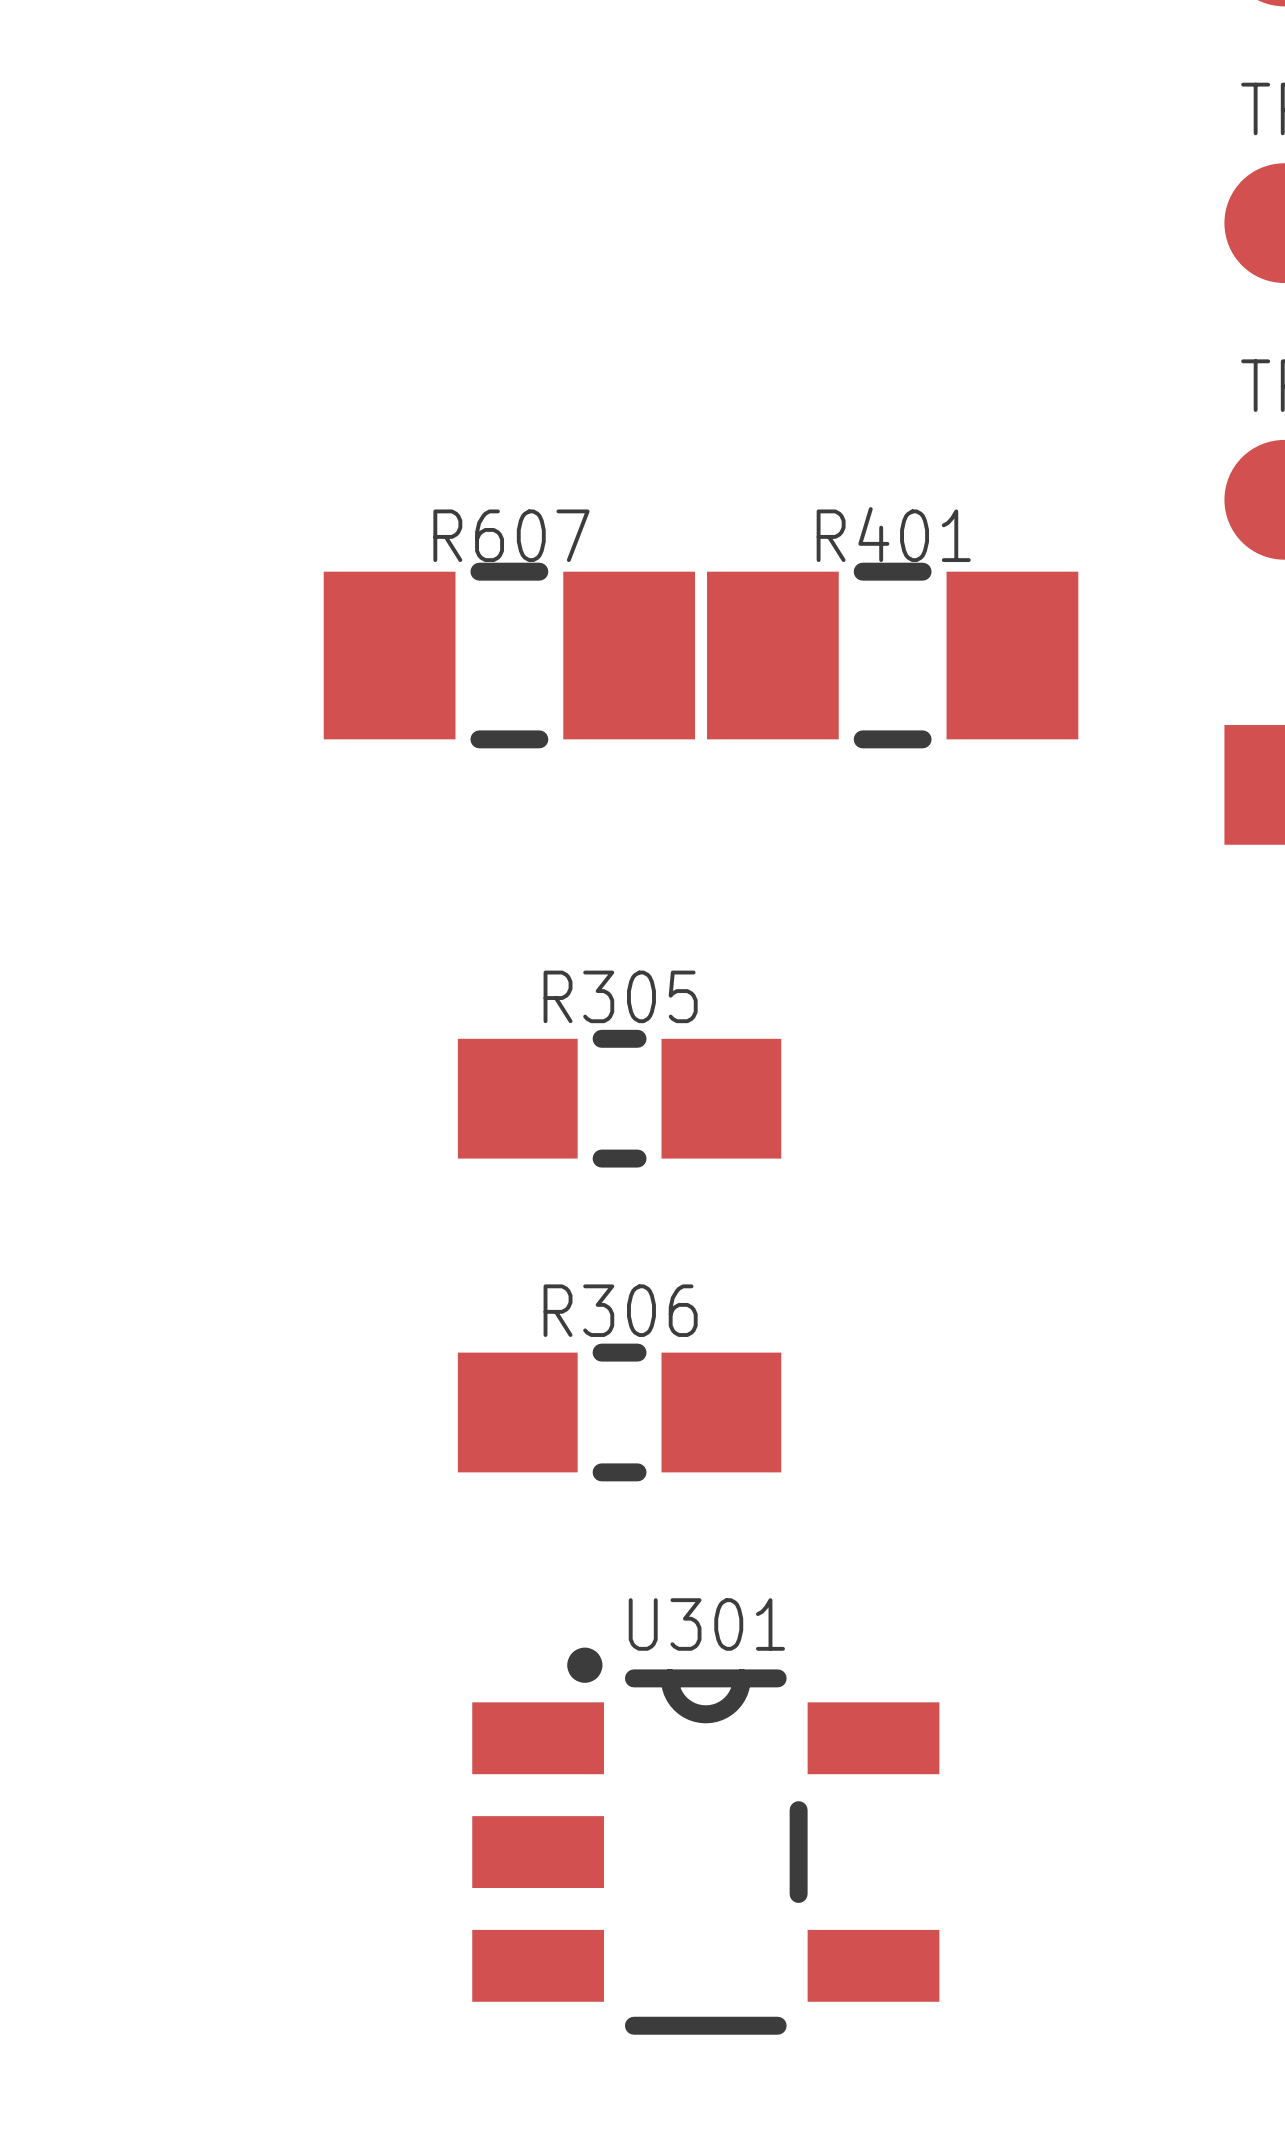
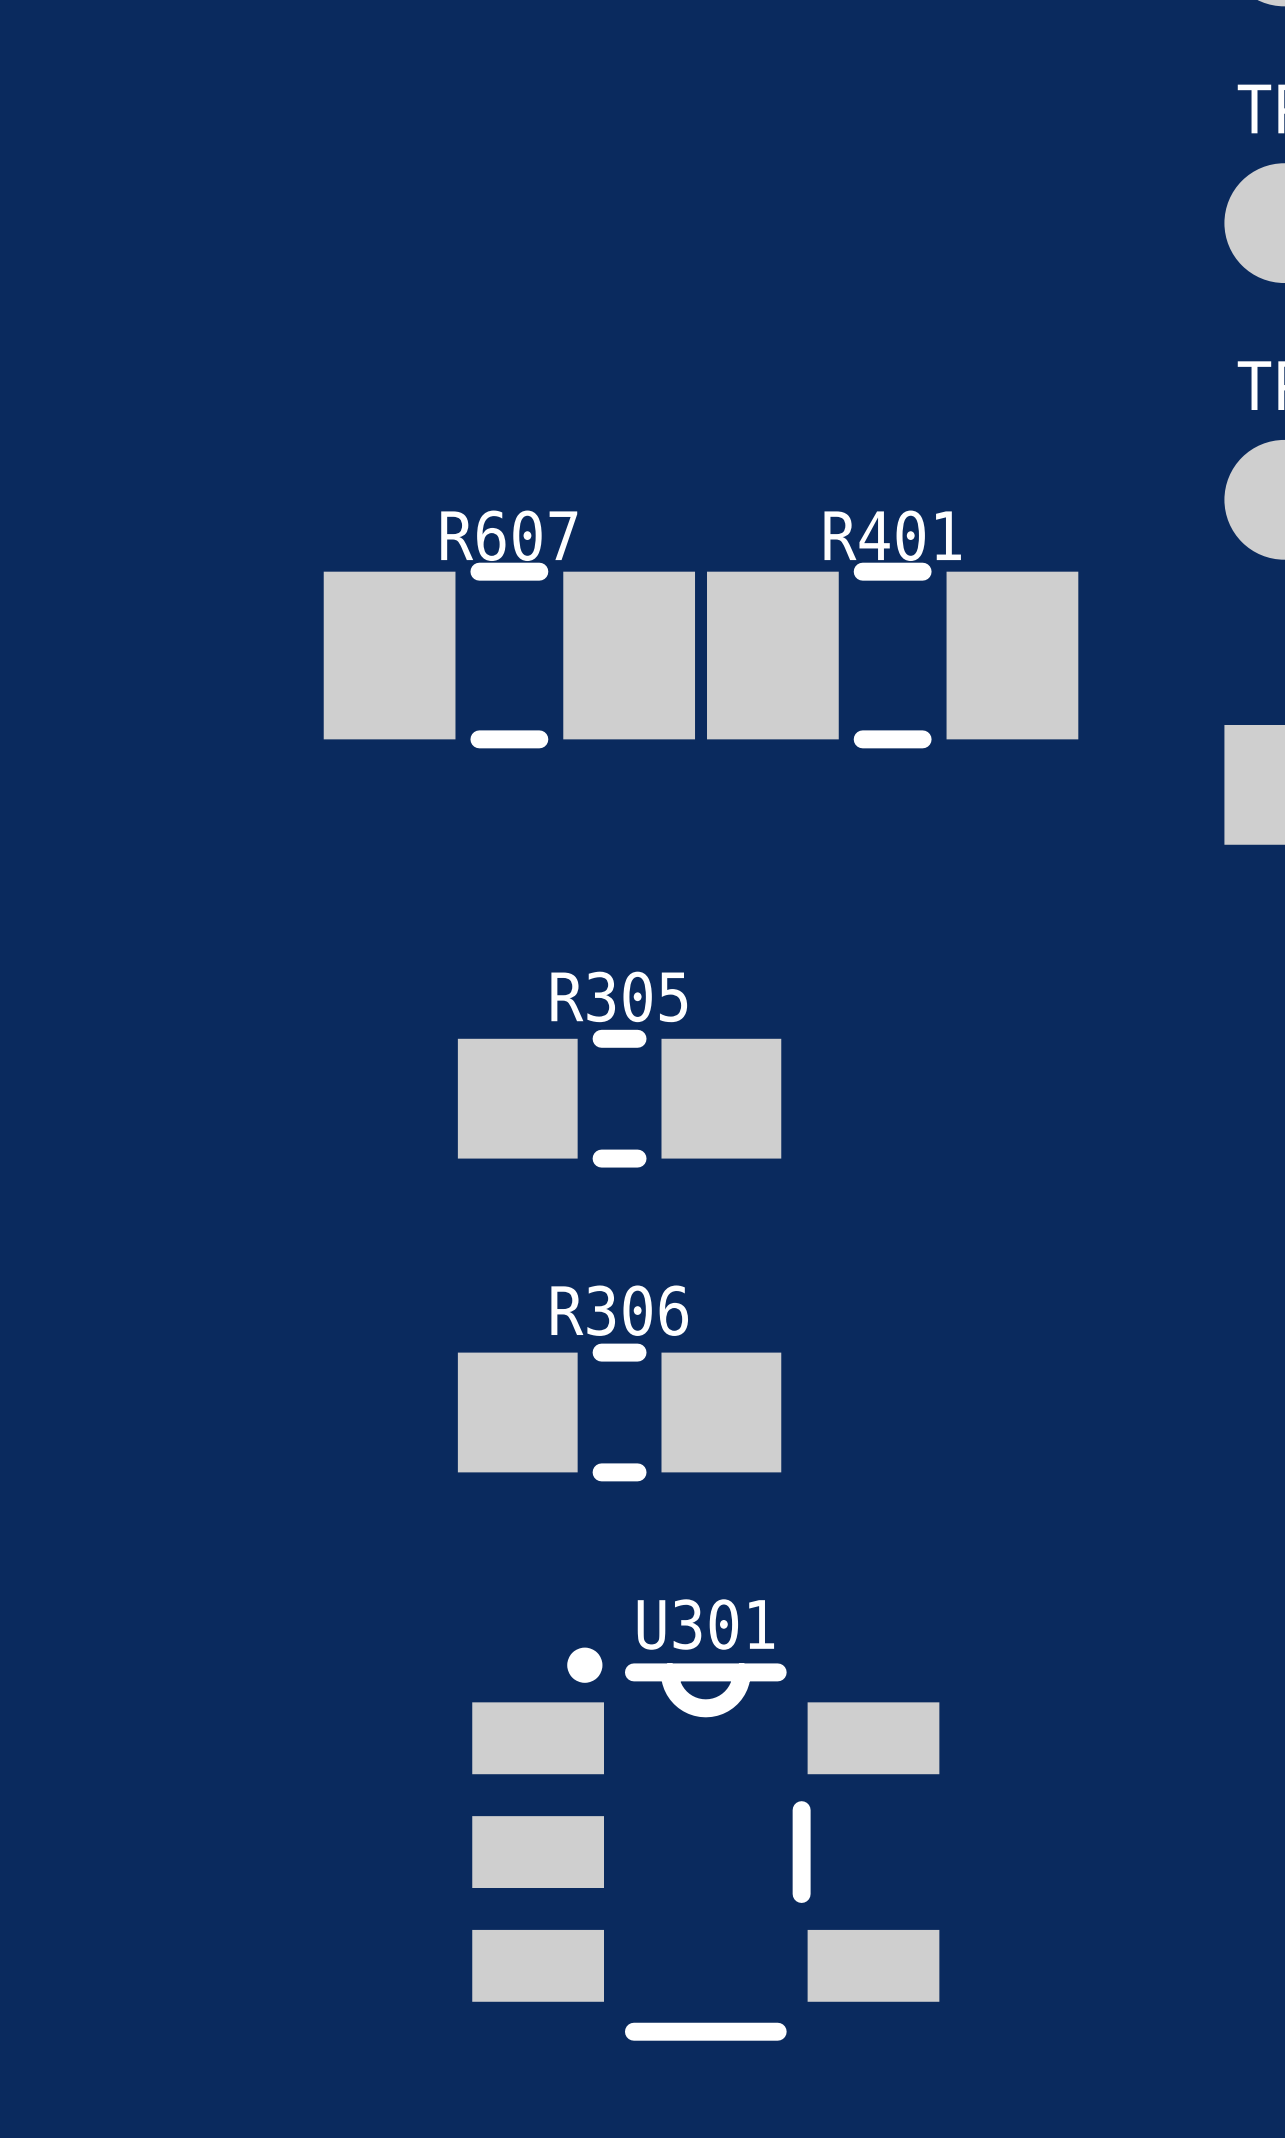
U301 footprint: [472, 1647, 940, 2035] -> [472, 1647, 940, 2041]

